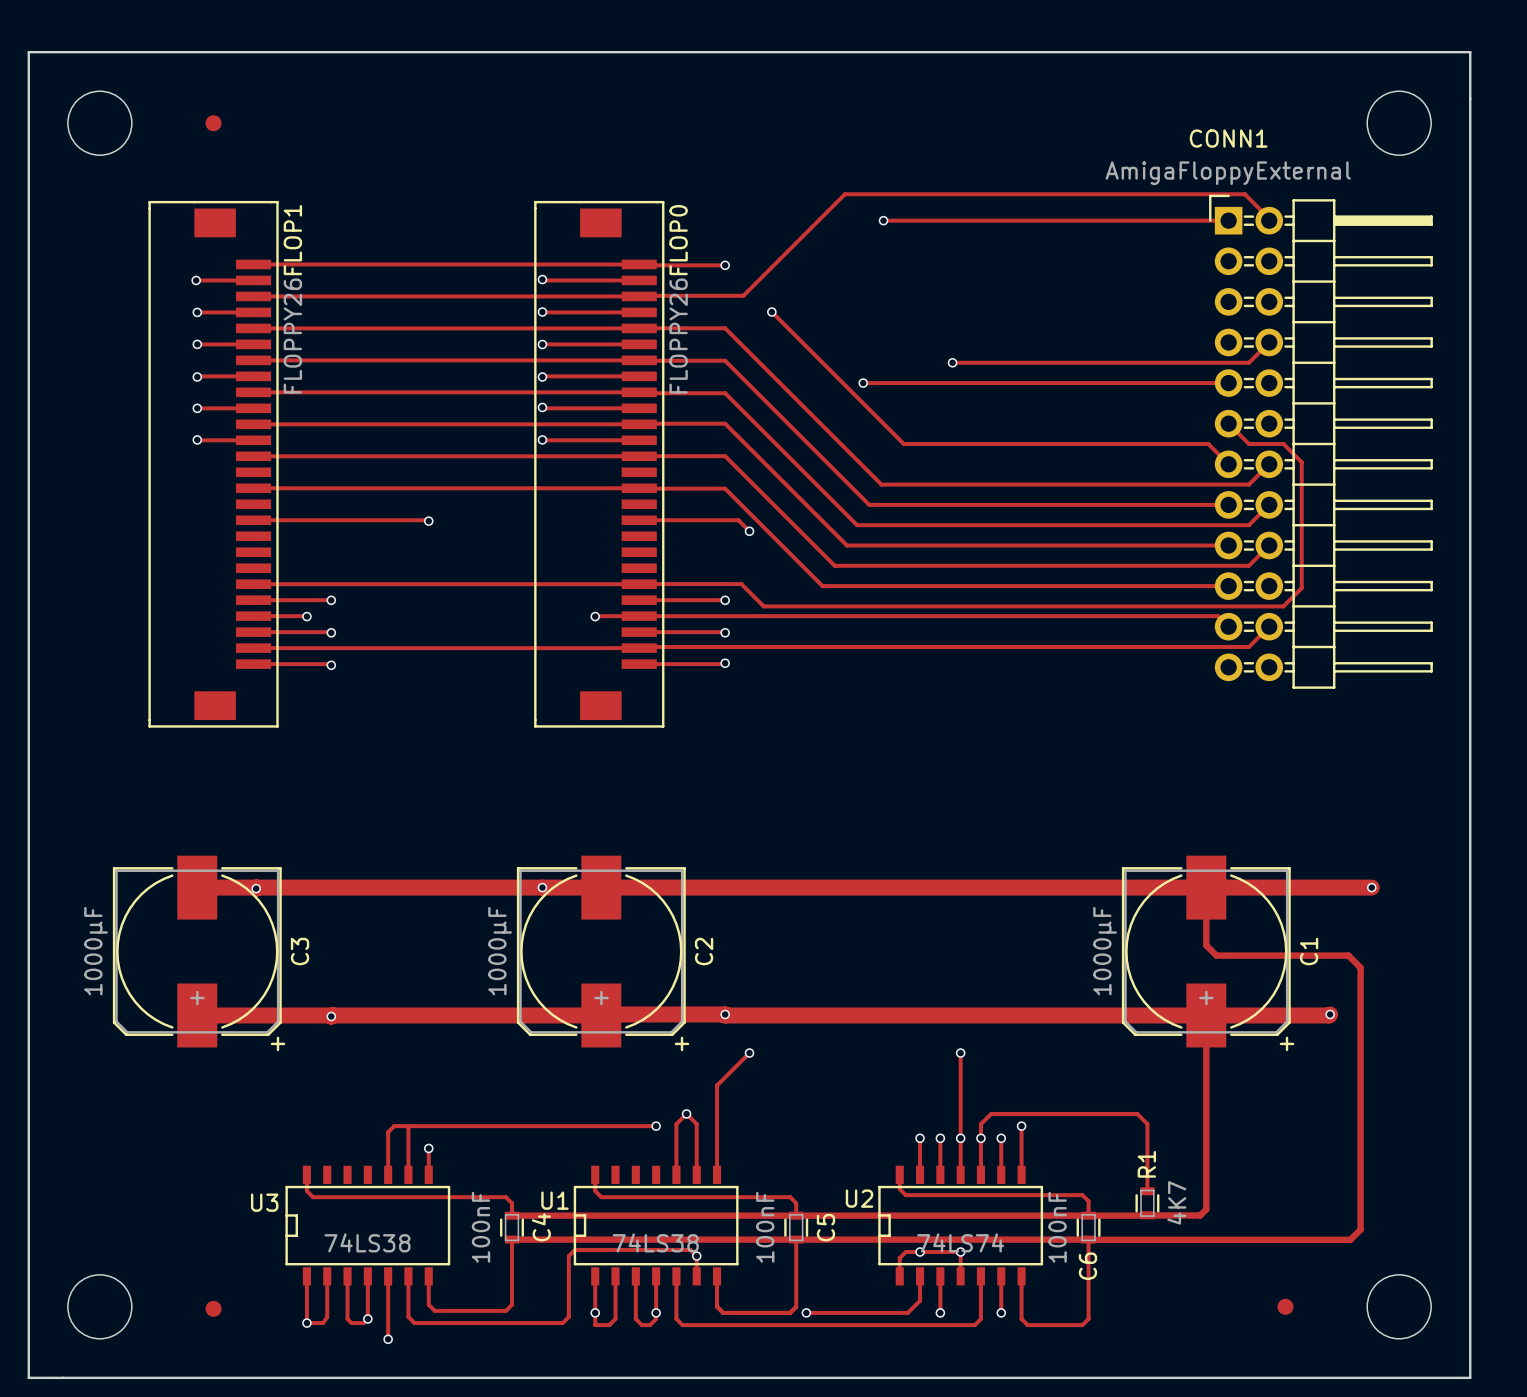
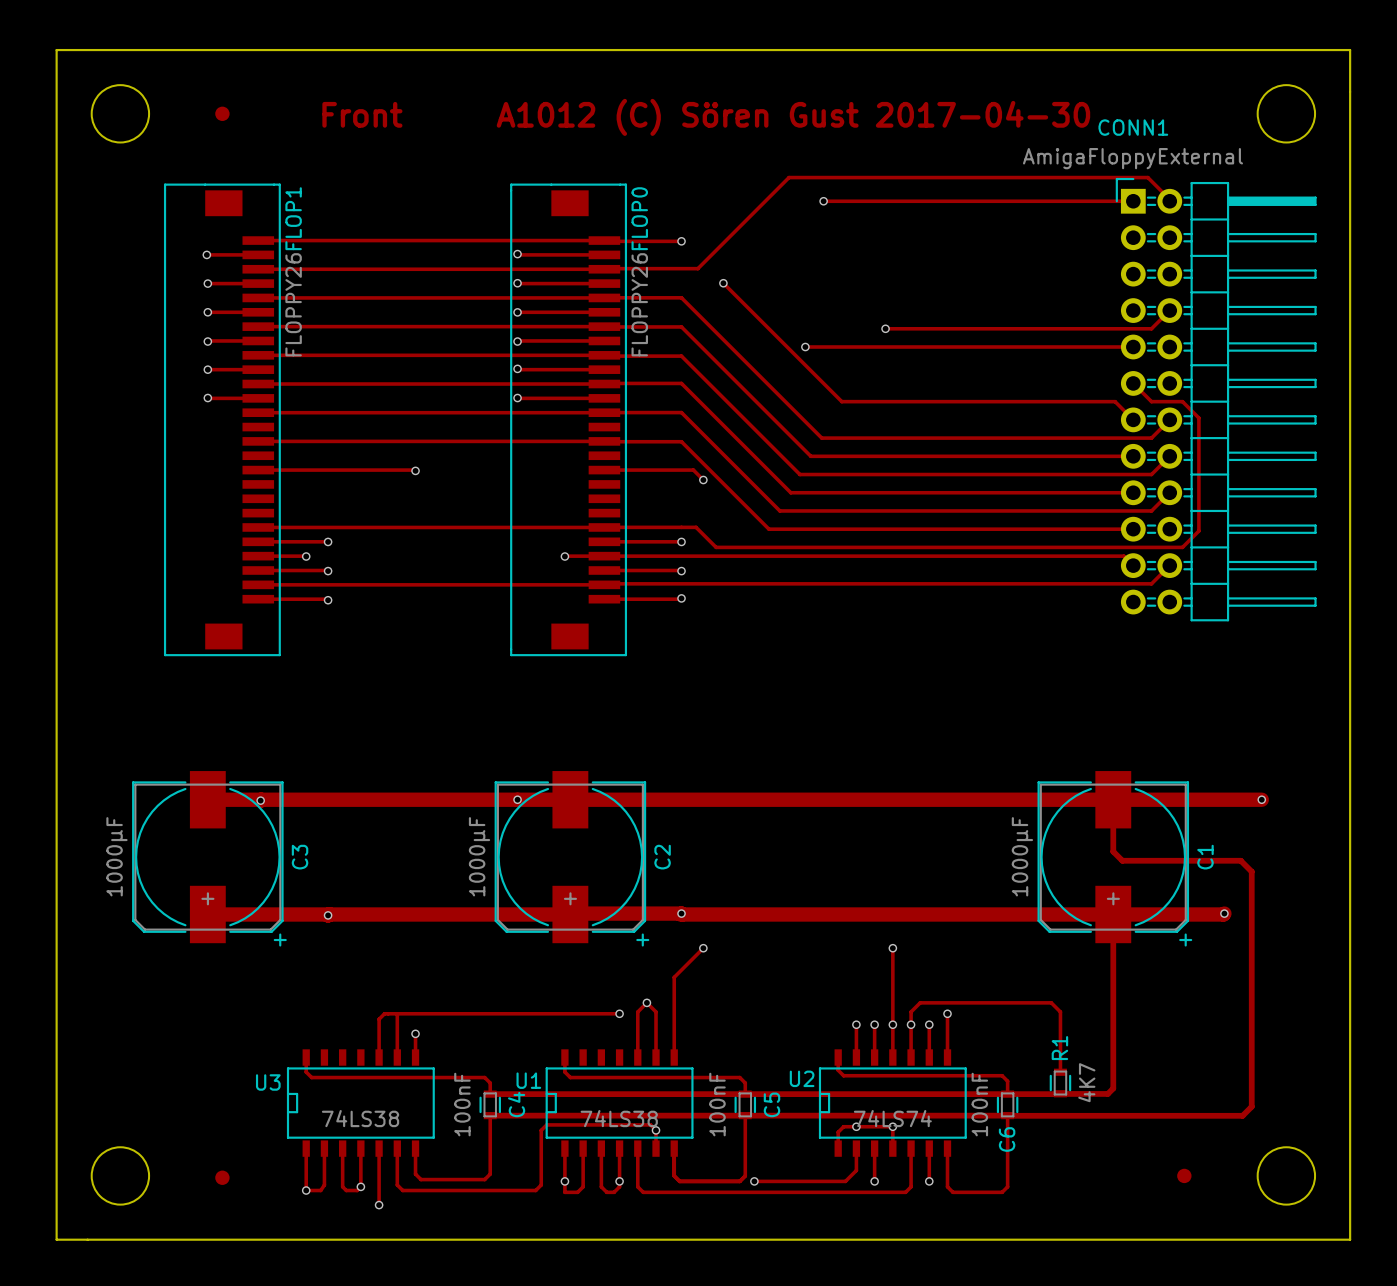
text: none -> Front (362, 114)
text: none -> A1012 (C) Sören Gust 2017-04-30 (793, 117)

